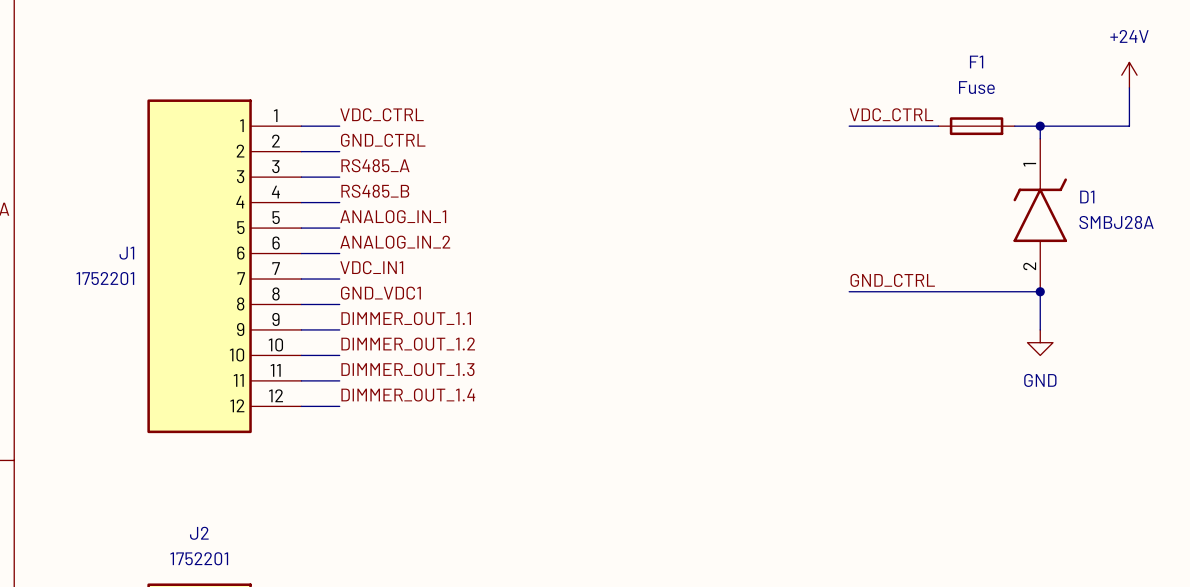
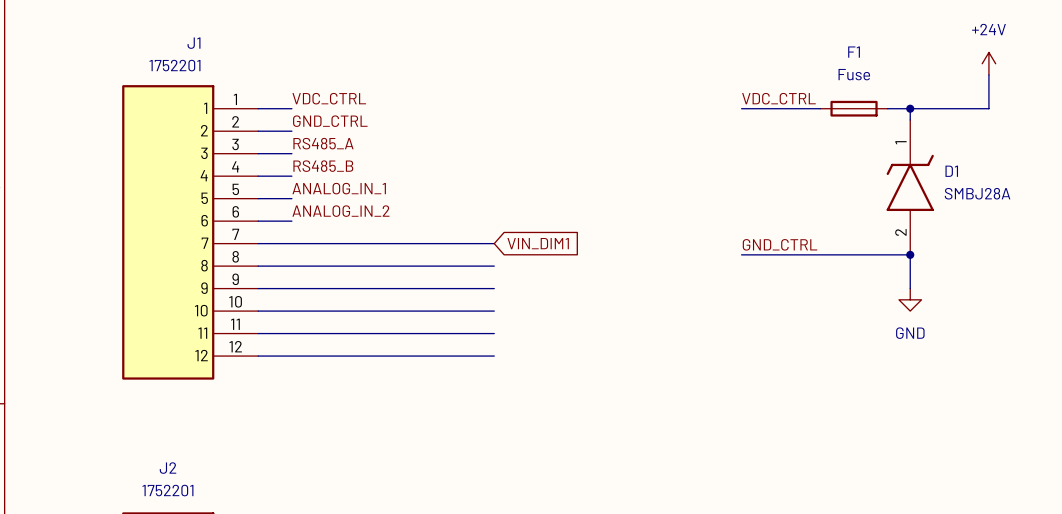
J1 name position: J1 (126, 253) -> J1 (194, 43)
label: VDC_IN1 (371, 267) -> none
J1 value position: 1752201 (105, 278) -> 1752201 (174, 65)
wire: none -> (291, 243) (494, 243)
global label: none -> VIN_DIM1 (538, 243)
label: GND_VDC1 (380, 293) -> none
wire: none -> (291, 266) (494, 266)
label: DIMMER_OUT_1.1 (406, 318) -> none
wire: none -> (291, 288) (494, 288)
label: DIMMER_OUT_1.2 (408, 344) -> none
wire: none -> (291, 311) (494, 311)
label: DIMMER_OUT_1.3 (407, 369) -> none
wire: none -> (291, 333) (494, 333)
label: DIMMER_OUT_1.4 (408, 395) -> none
wire: none -> (291, 356) (494, 356)

